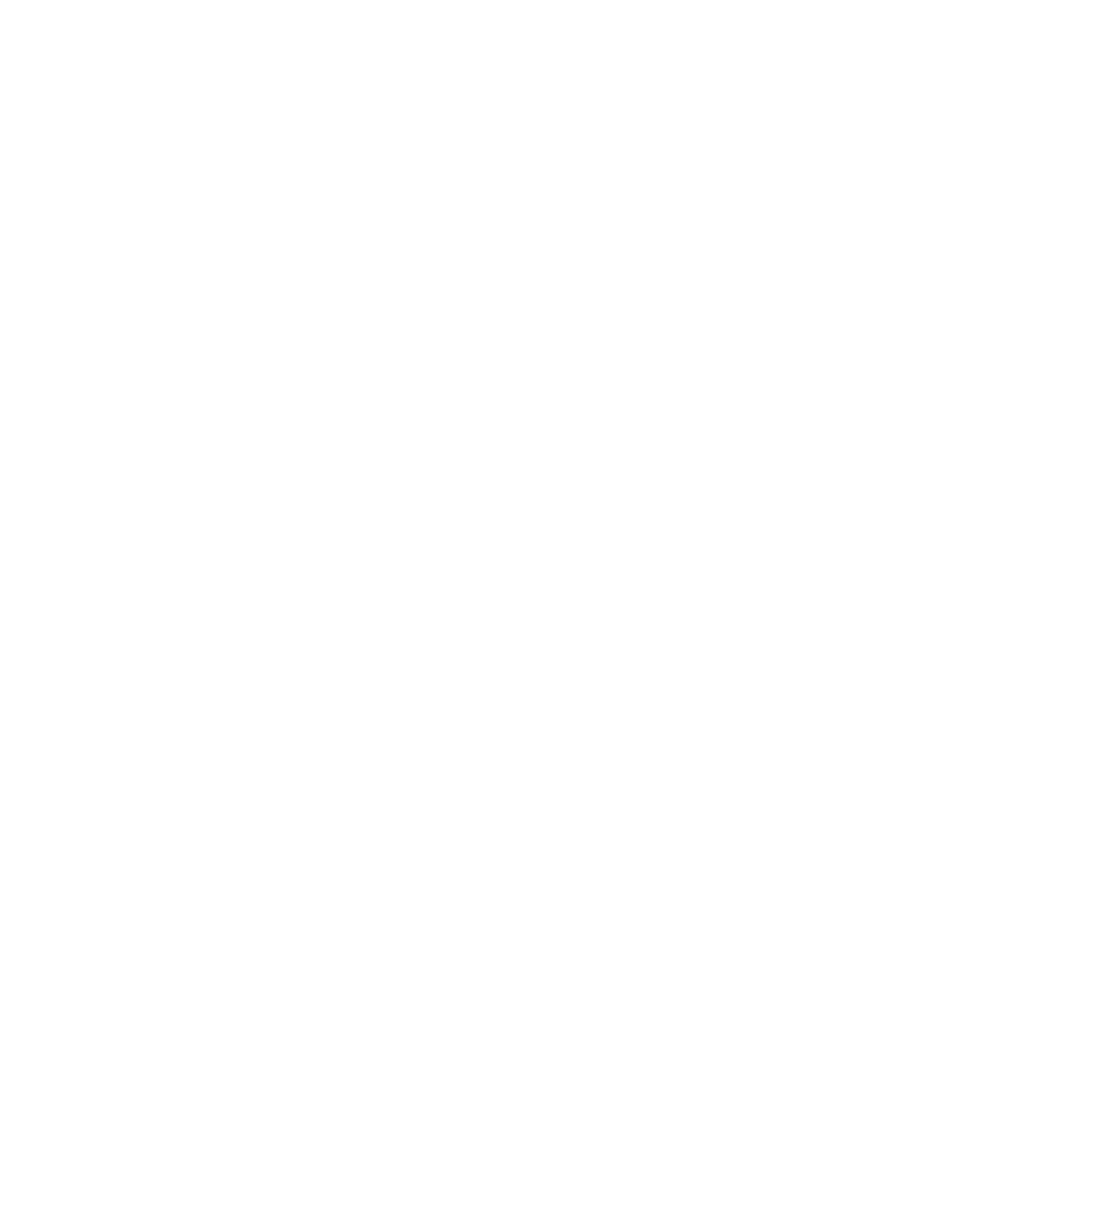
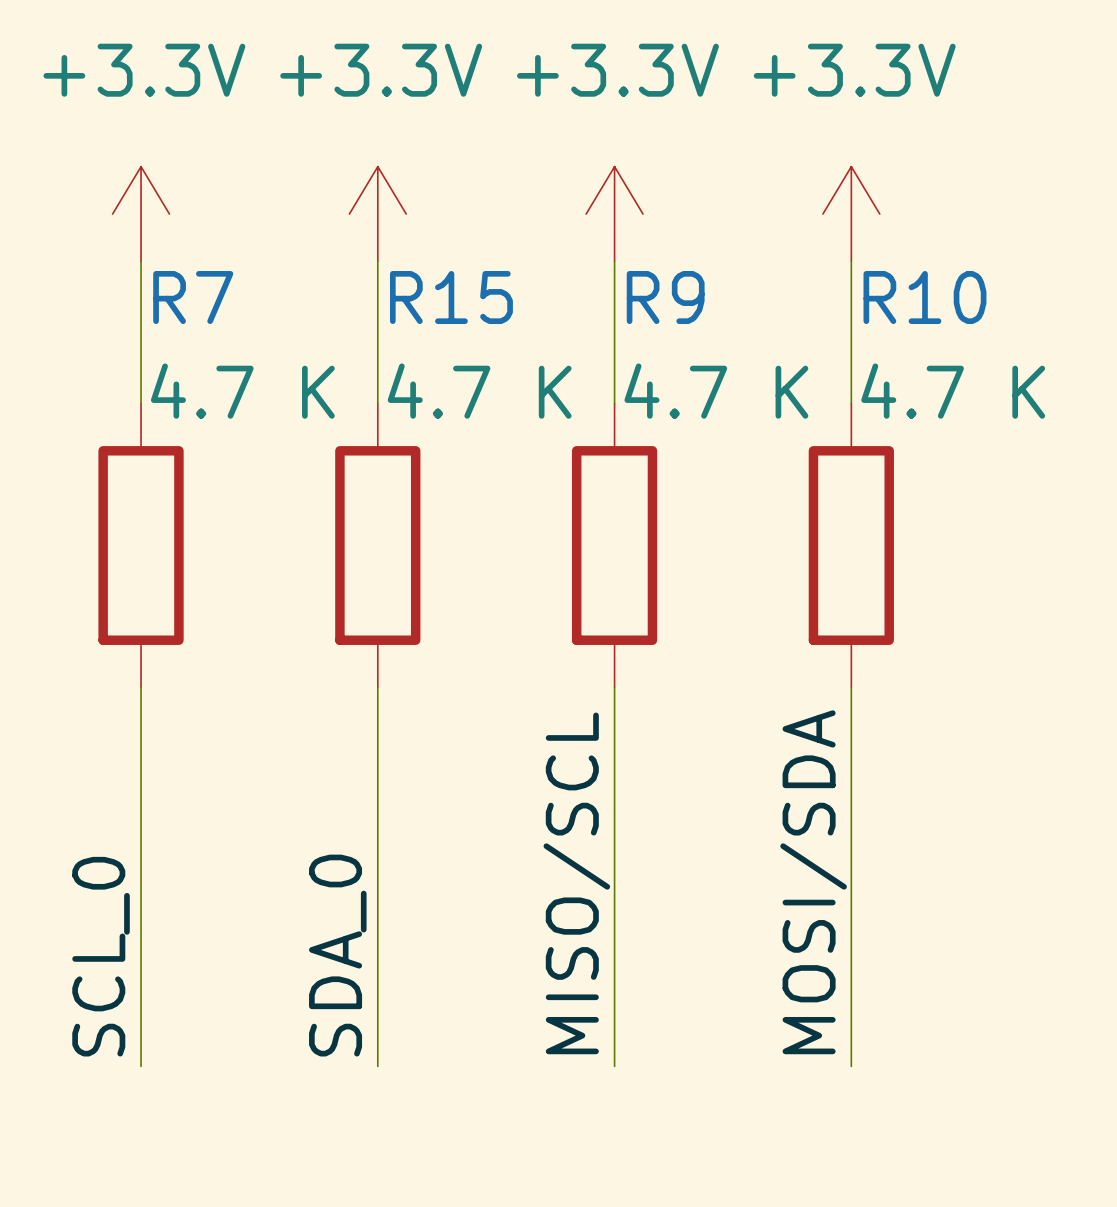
power symbol: none -> +3.3V (141, 214)
power symbol: none -> +3.3V (377, 214)
power symbol: none -> +3.3V (614, 214)
power symbol: none -> +3.3V (851, 214)
wire: none -> (141, 261) (141, 403)
wire: none -> (377, 261) (377, 403)
wire: none -> (614, 261) (614, 403)
wire: none -> (851, 261) (851, 403)
R7: none -> 4.7 K (141, 545)
R15: none -> 4.7 K (377, 545)
R9: none -> 4.7 K (614, 545)
R10: none -> 4.7 K (851, 545)
wire: none -> (141, 687) (141, 1066)
wire: none -> (377, 687) (377, 1066)
wire: none -> (614, 687) (614, 1066)
wire: none -> (851, 687) (851, 1066)
label: none -> MOSI/SDA (813, 882)
label: none -> MISO/SCL (576, 883)
label: none -> SDA_0 (337, 955)
label: none -> SCL_0 (101, 956)

